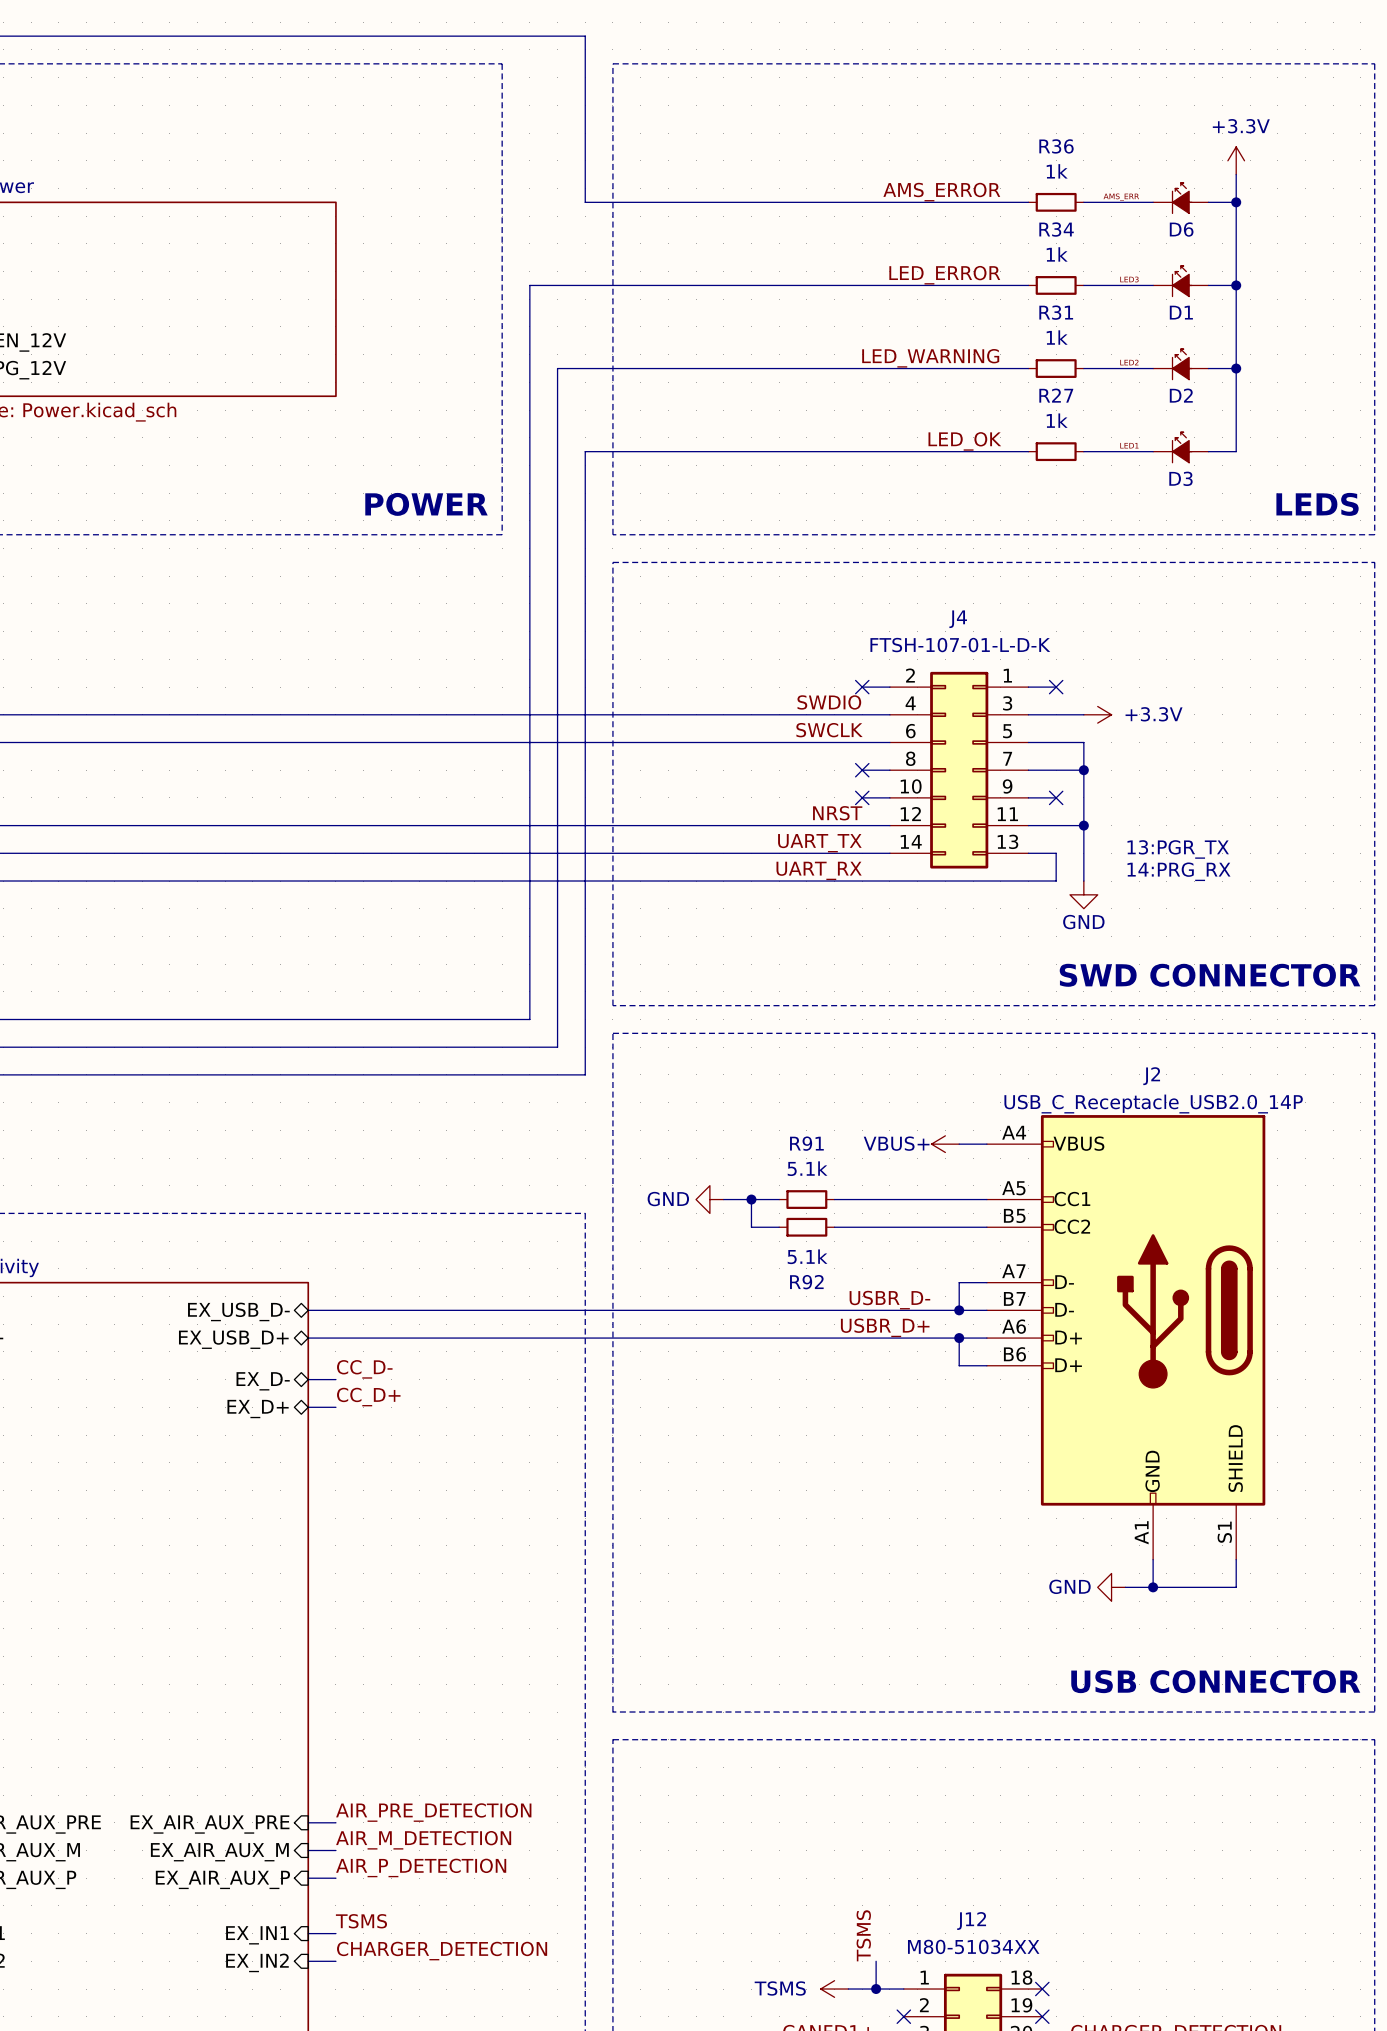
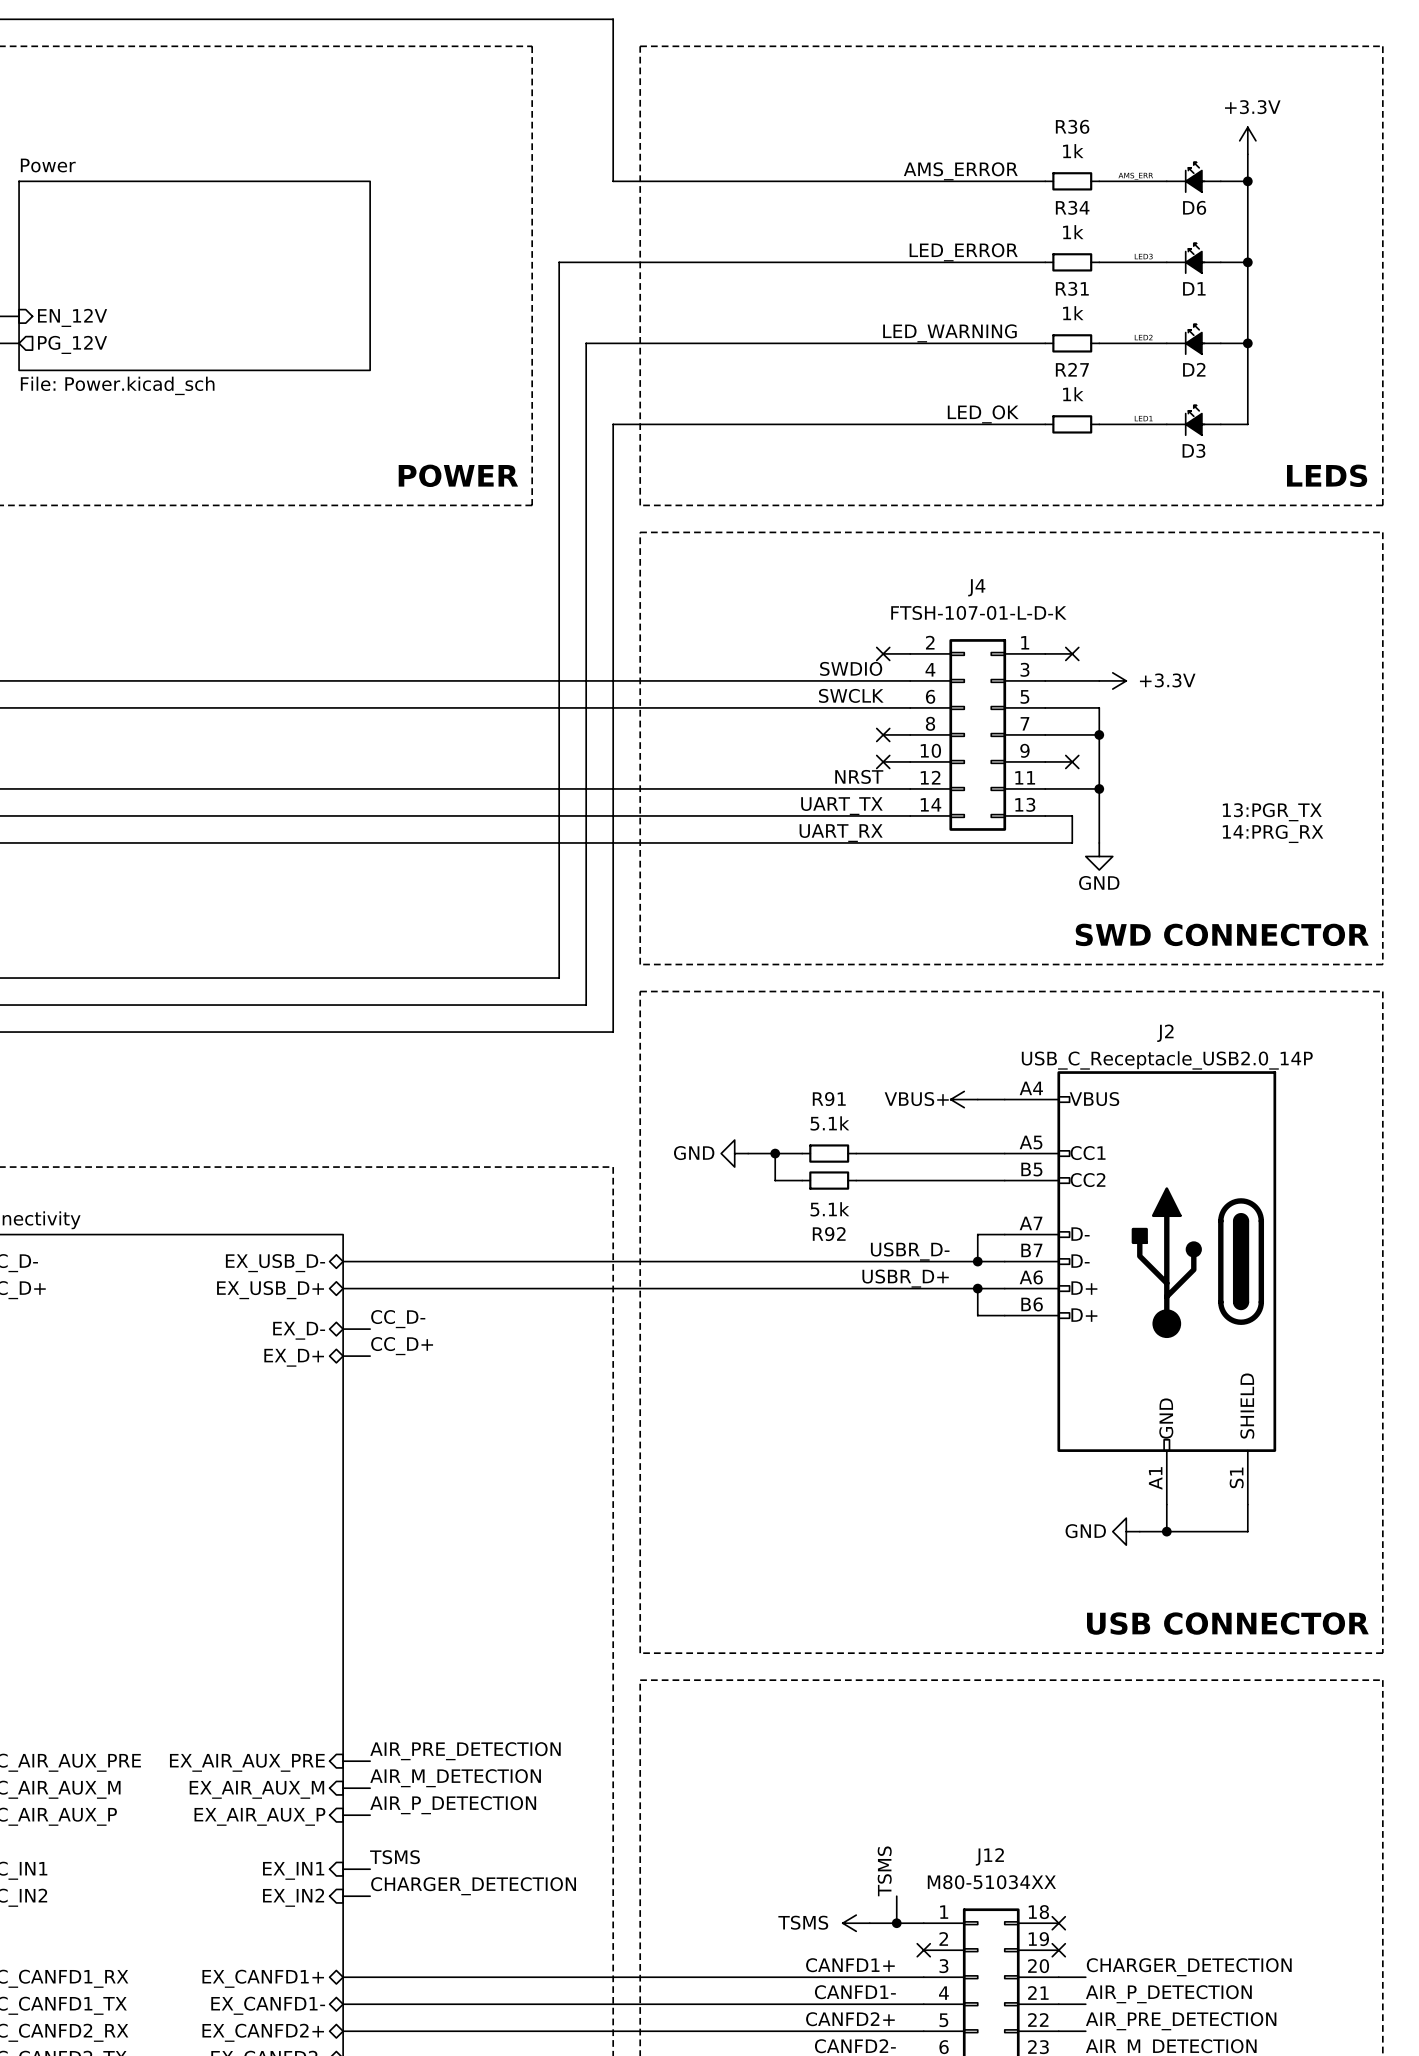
text position: 13:PGR_TX (1178, 849) -> 13:PGR_TX (1272, 812)
text position: 14:PRG_RX (1178, 871) -> 14:PRG_RX (1273, 833)

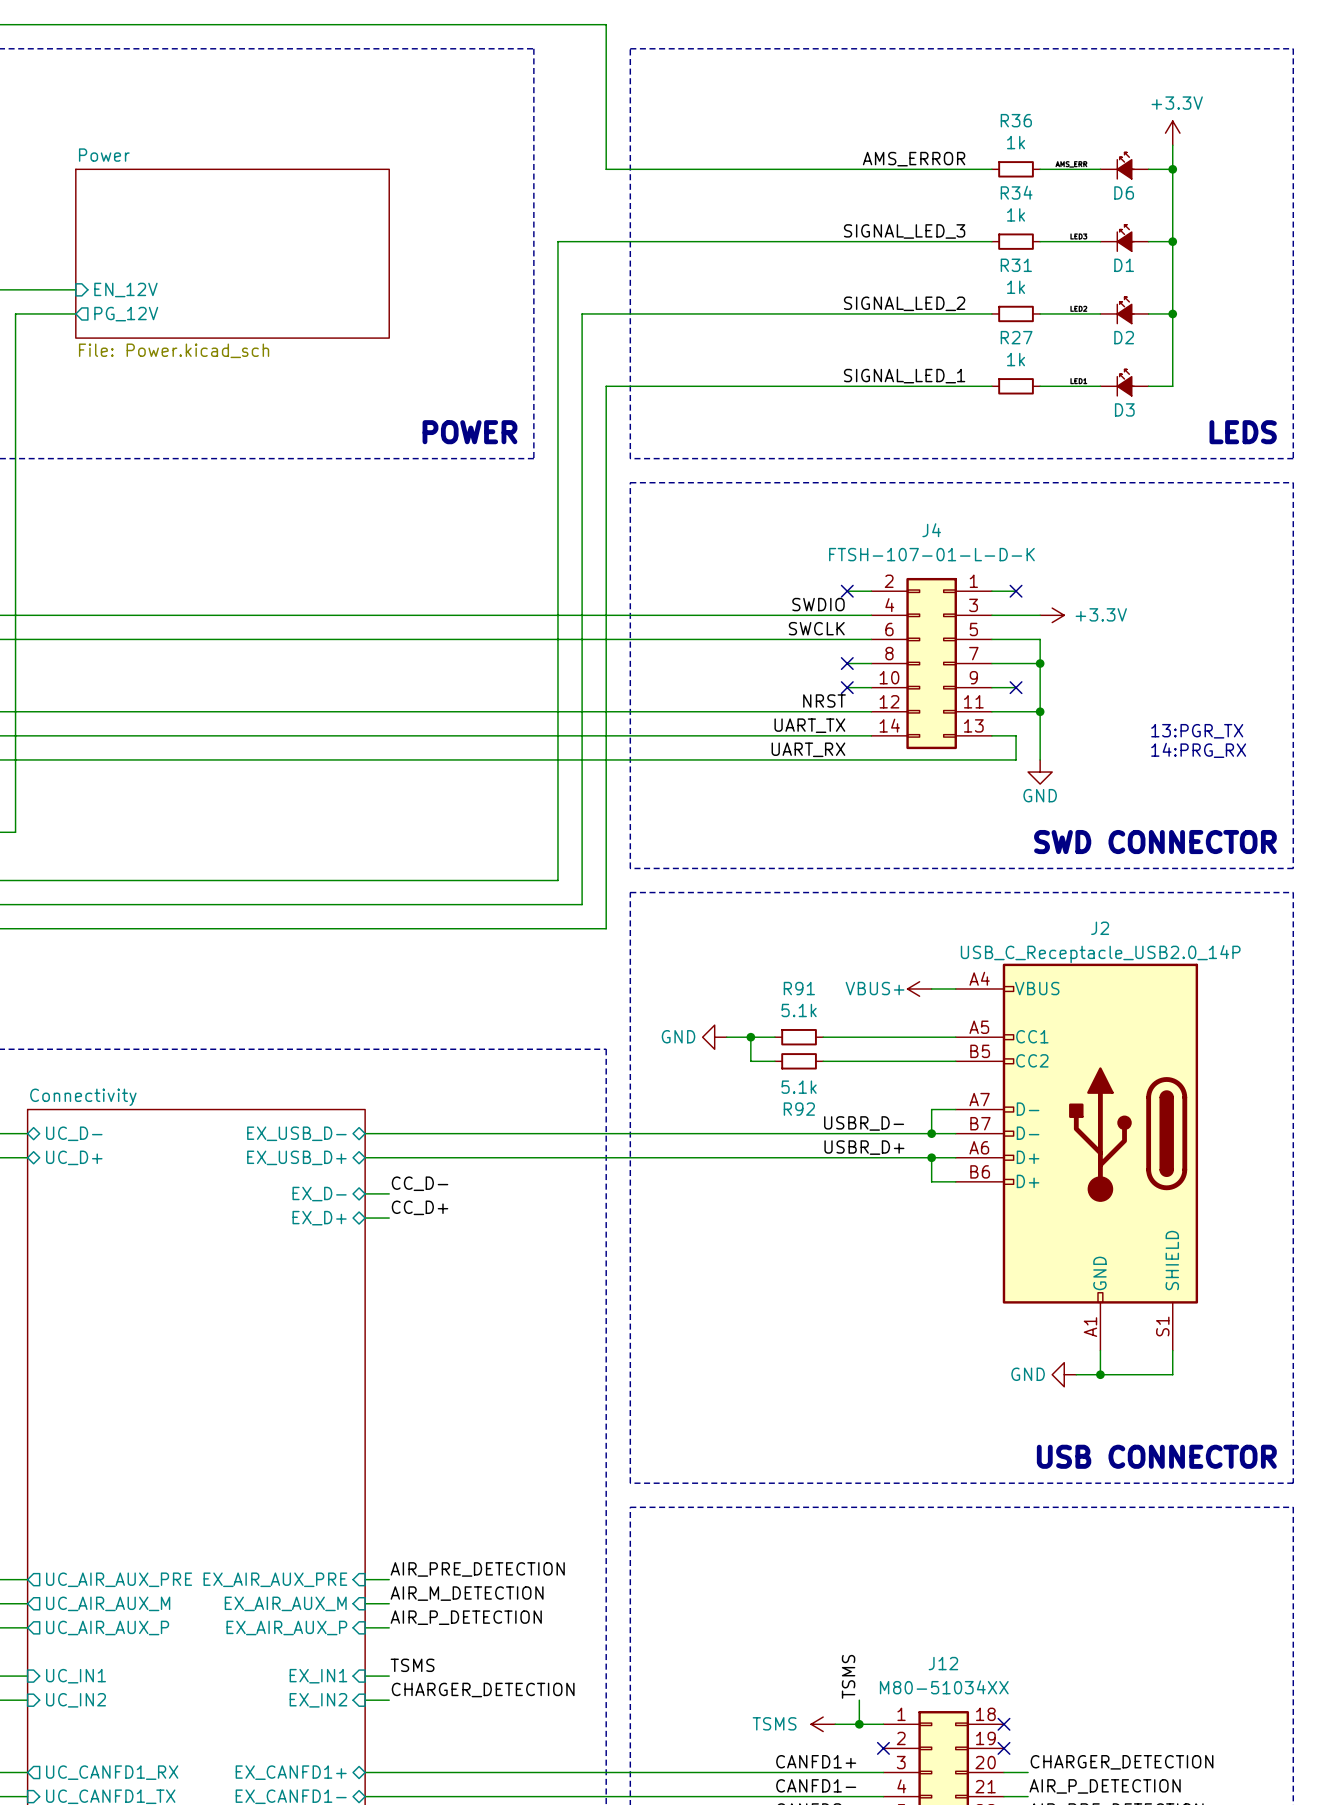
label: LED_ERROR (963, 252) -> SIGNAL_LED_3 (904, 231)
label: LED_WARNING (949, 333) -> SIGNAL_LED_2 (904, 303)
label: LED_OK (983, 414) -> SIGNAL_LED_1 (904, 376)

